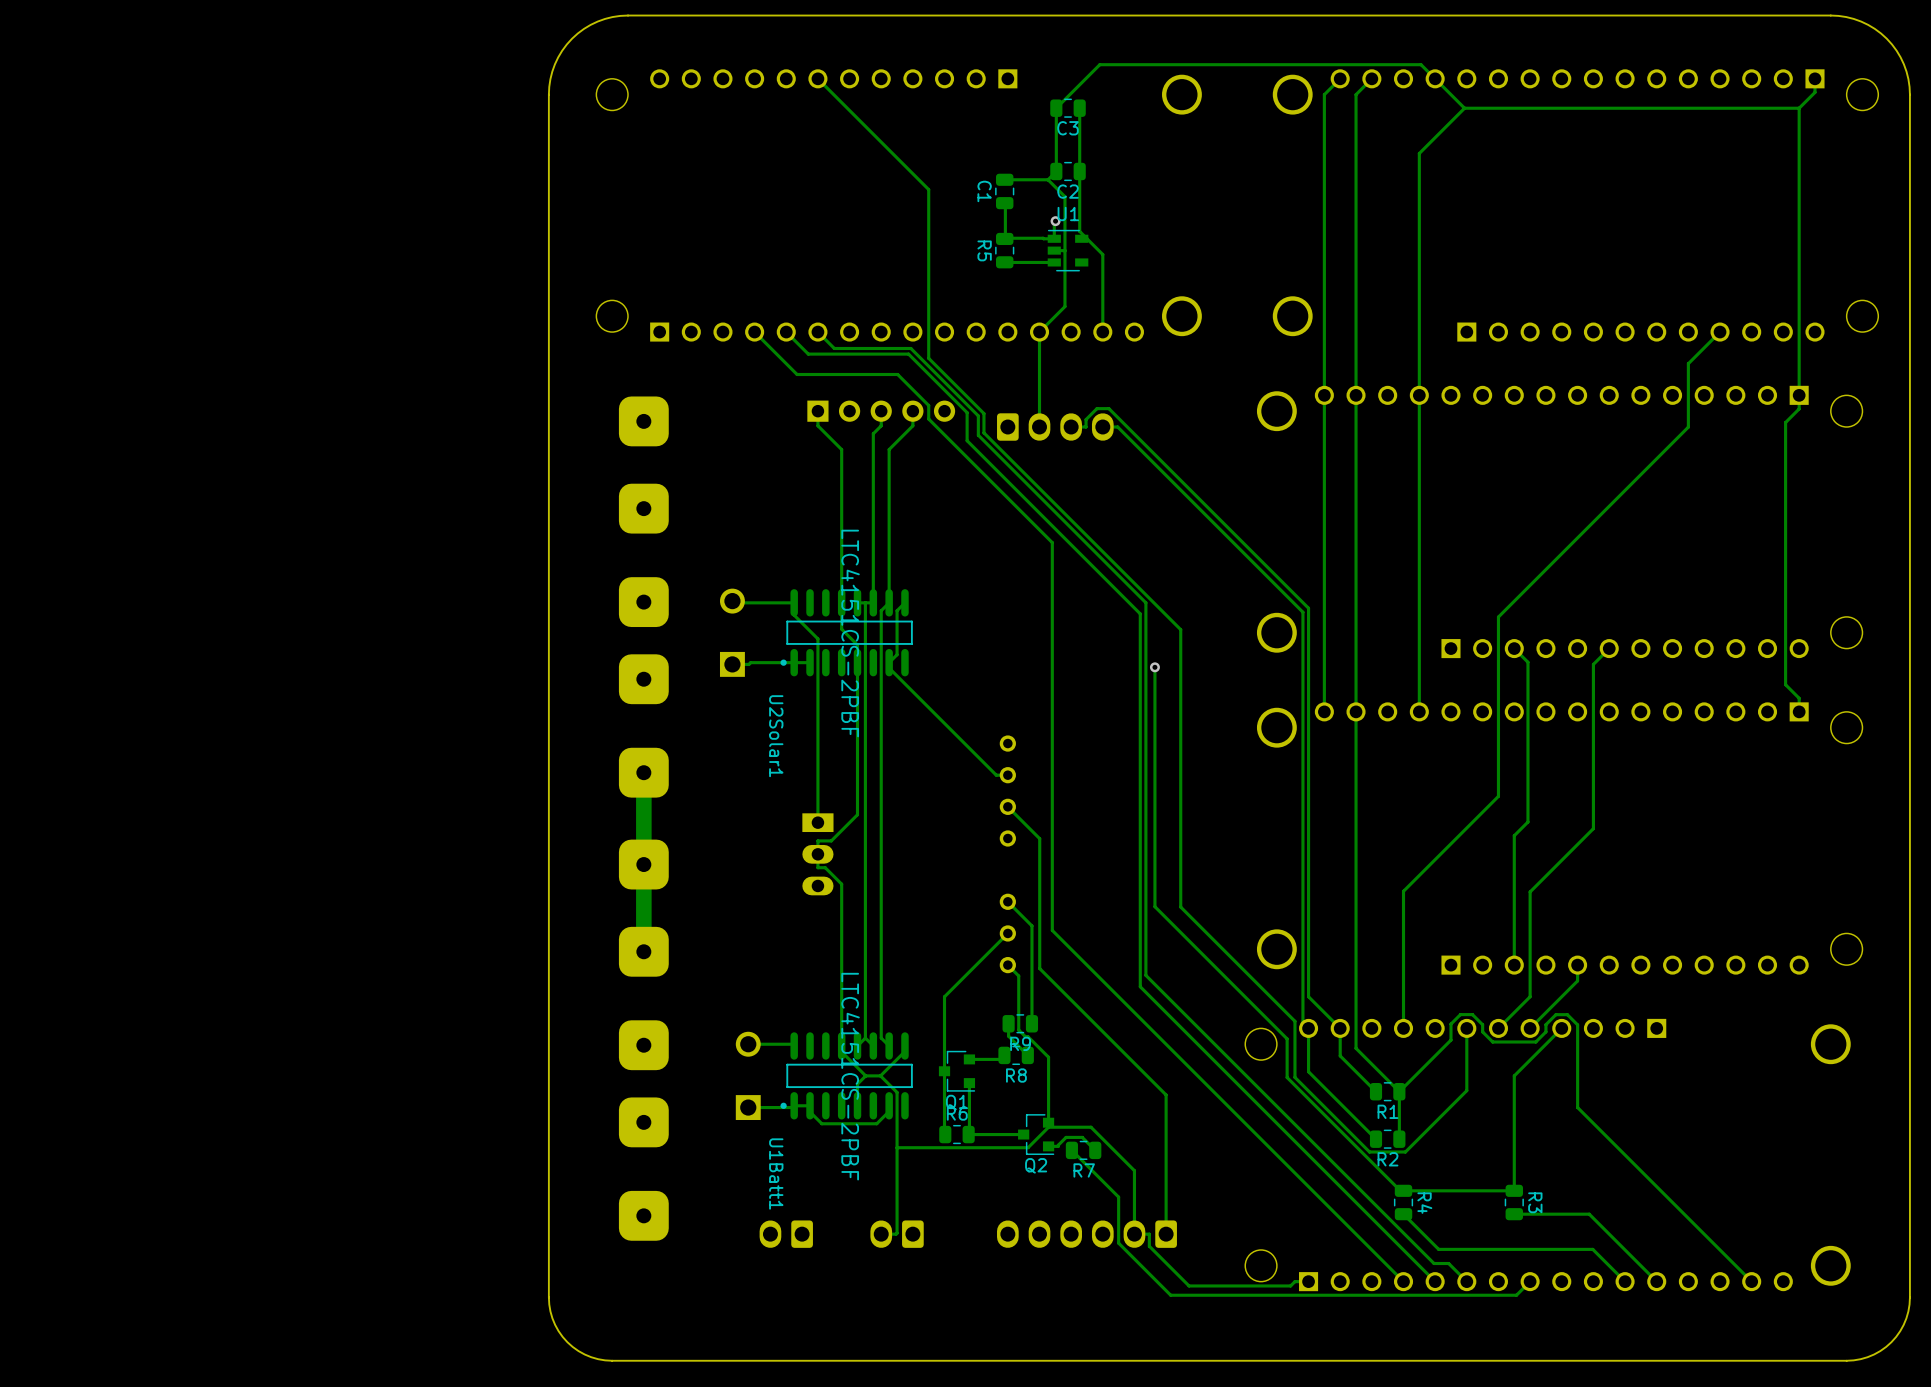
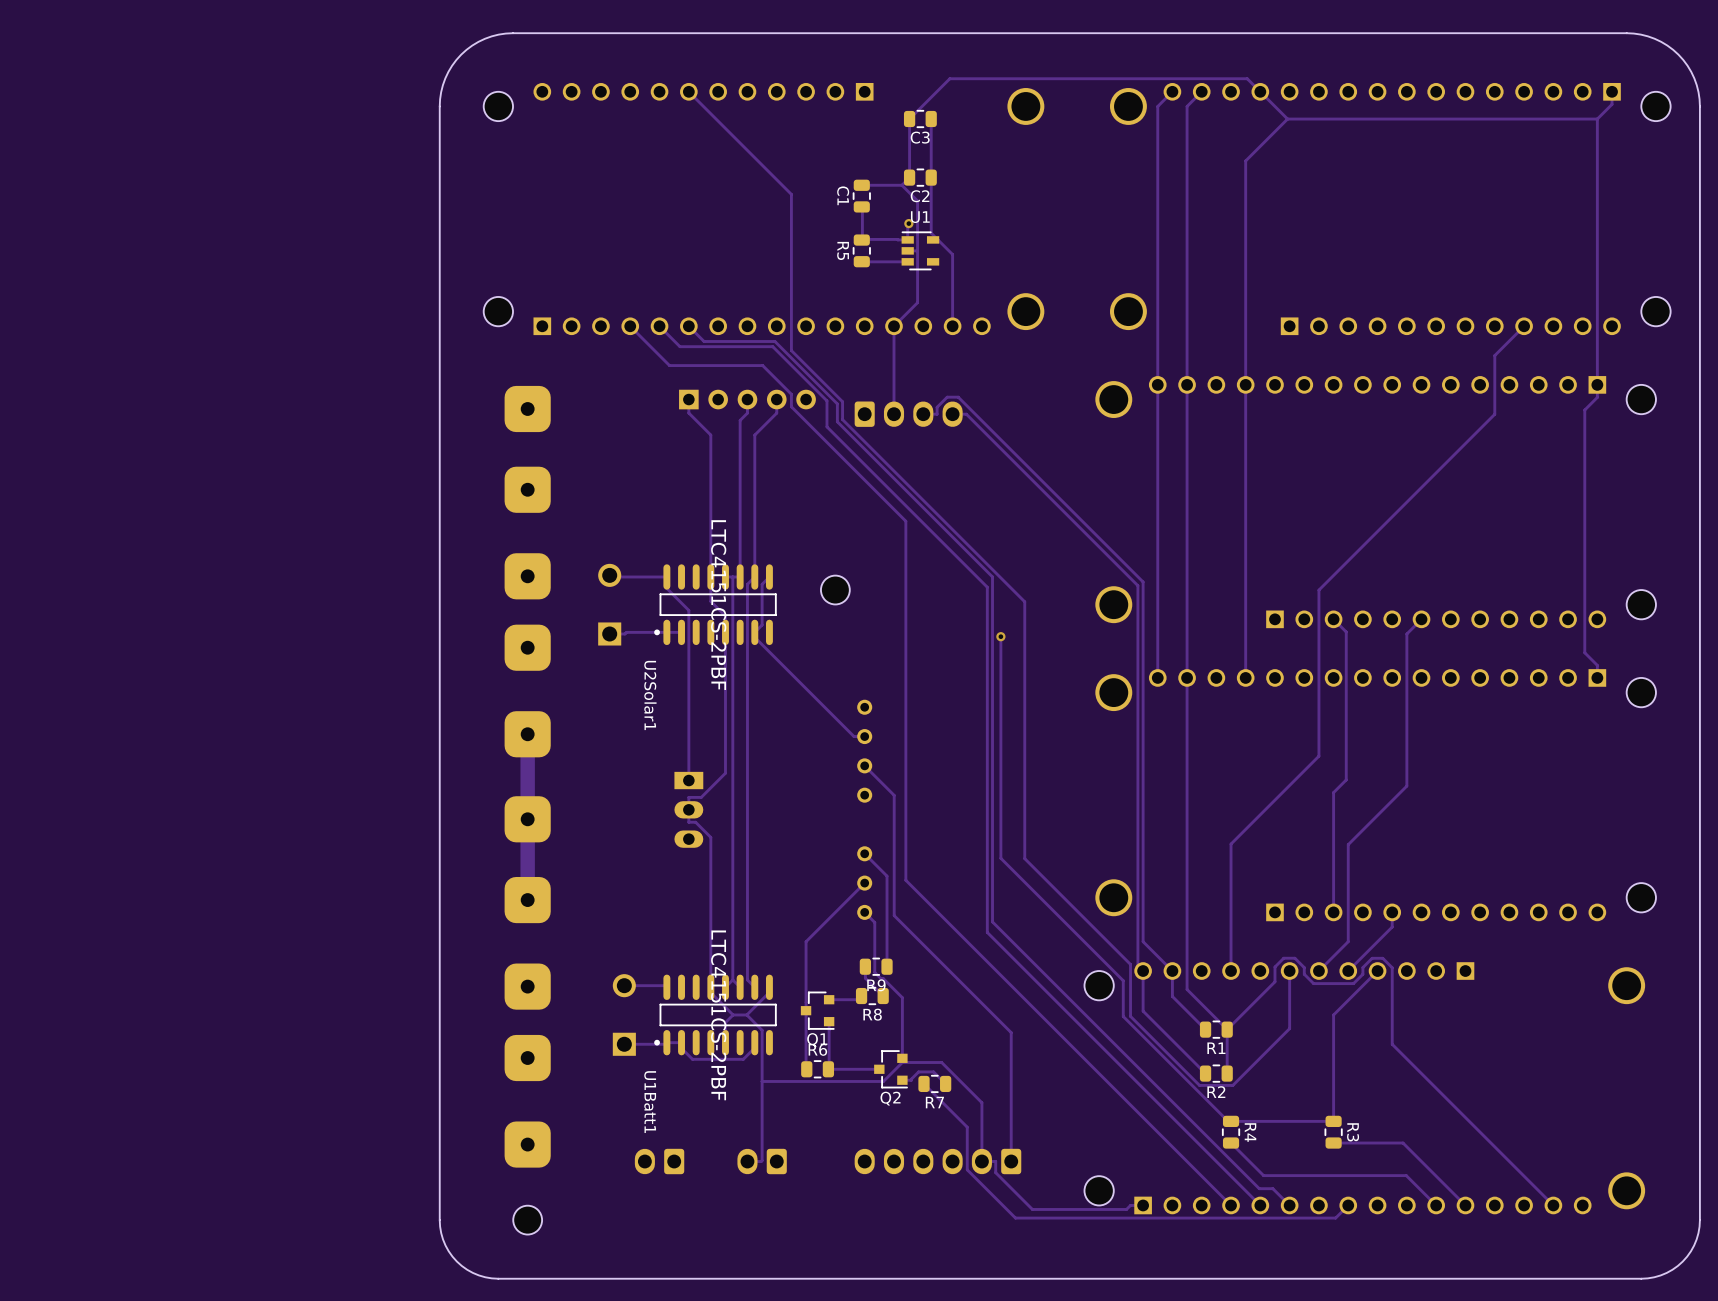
part: none -> (835, 590)
part: none -> (527, 1220)

